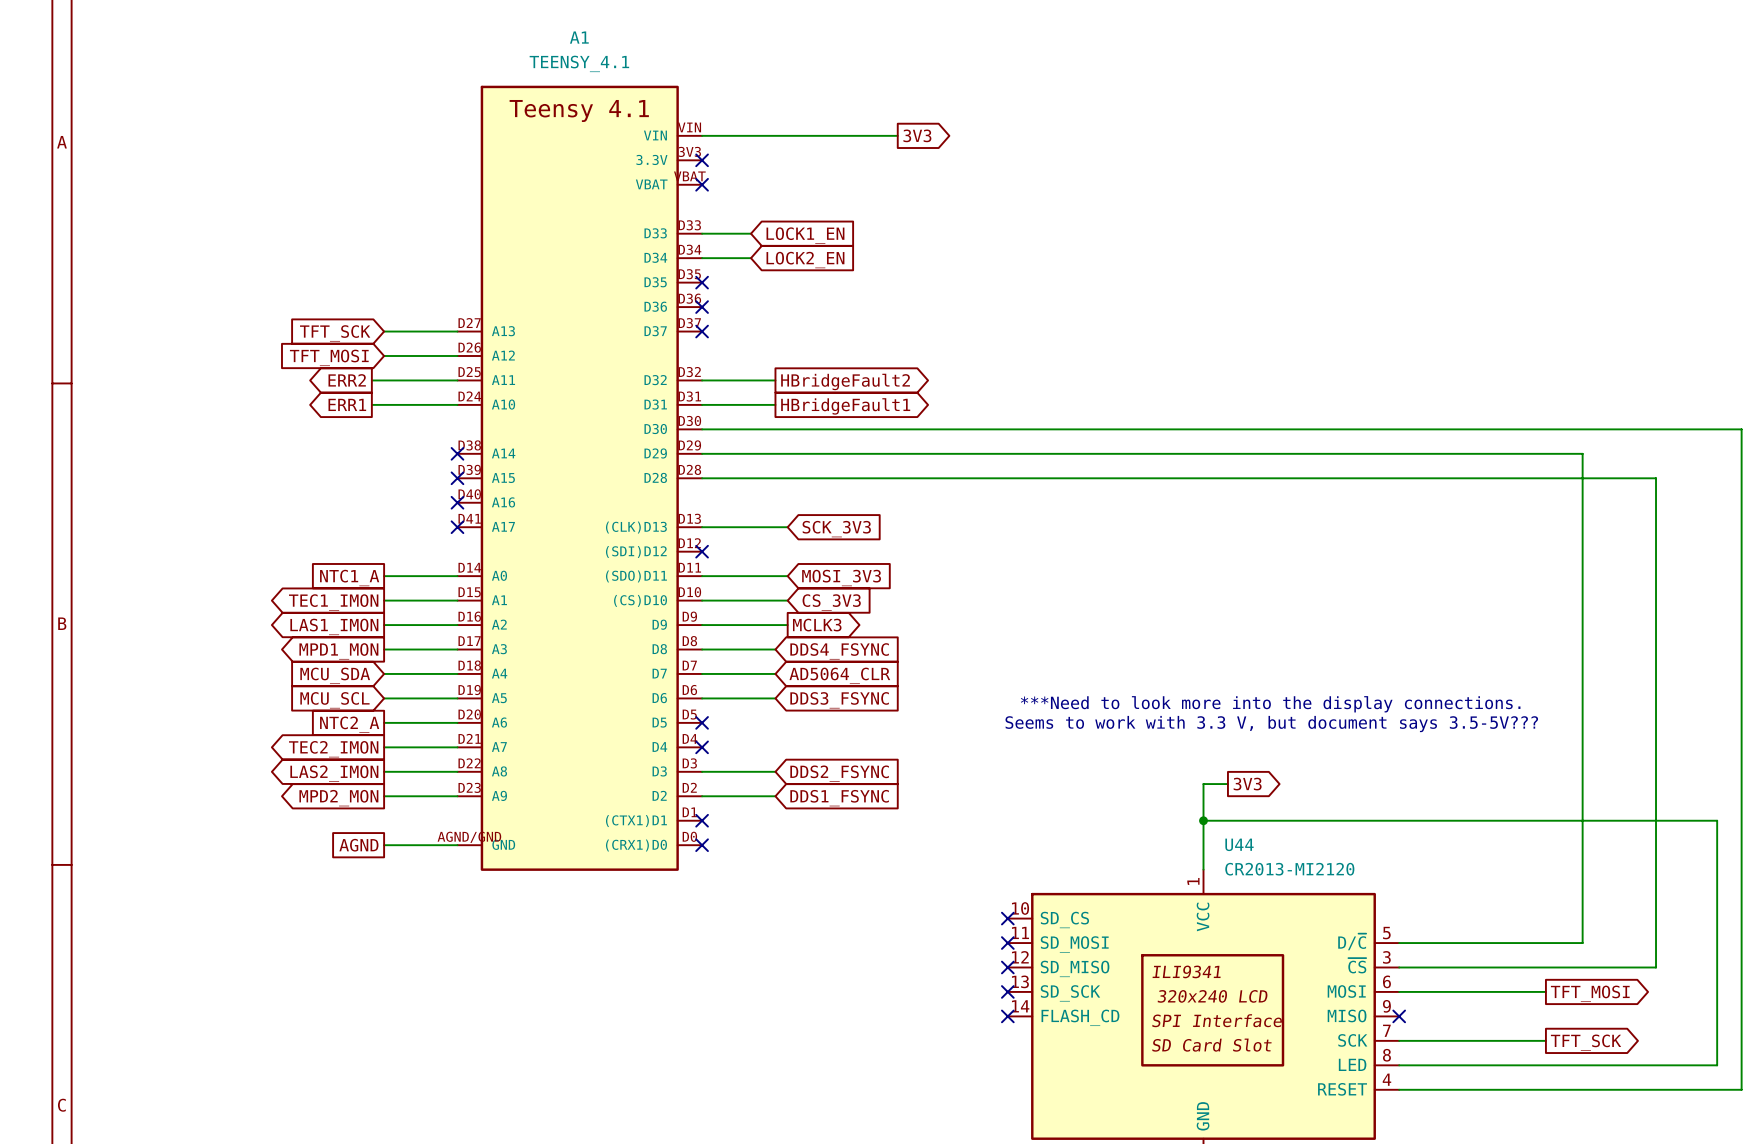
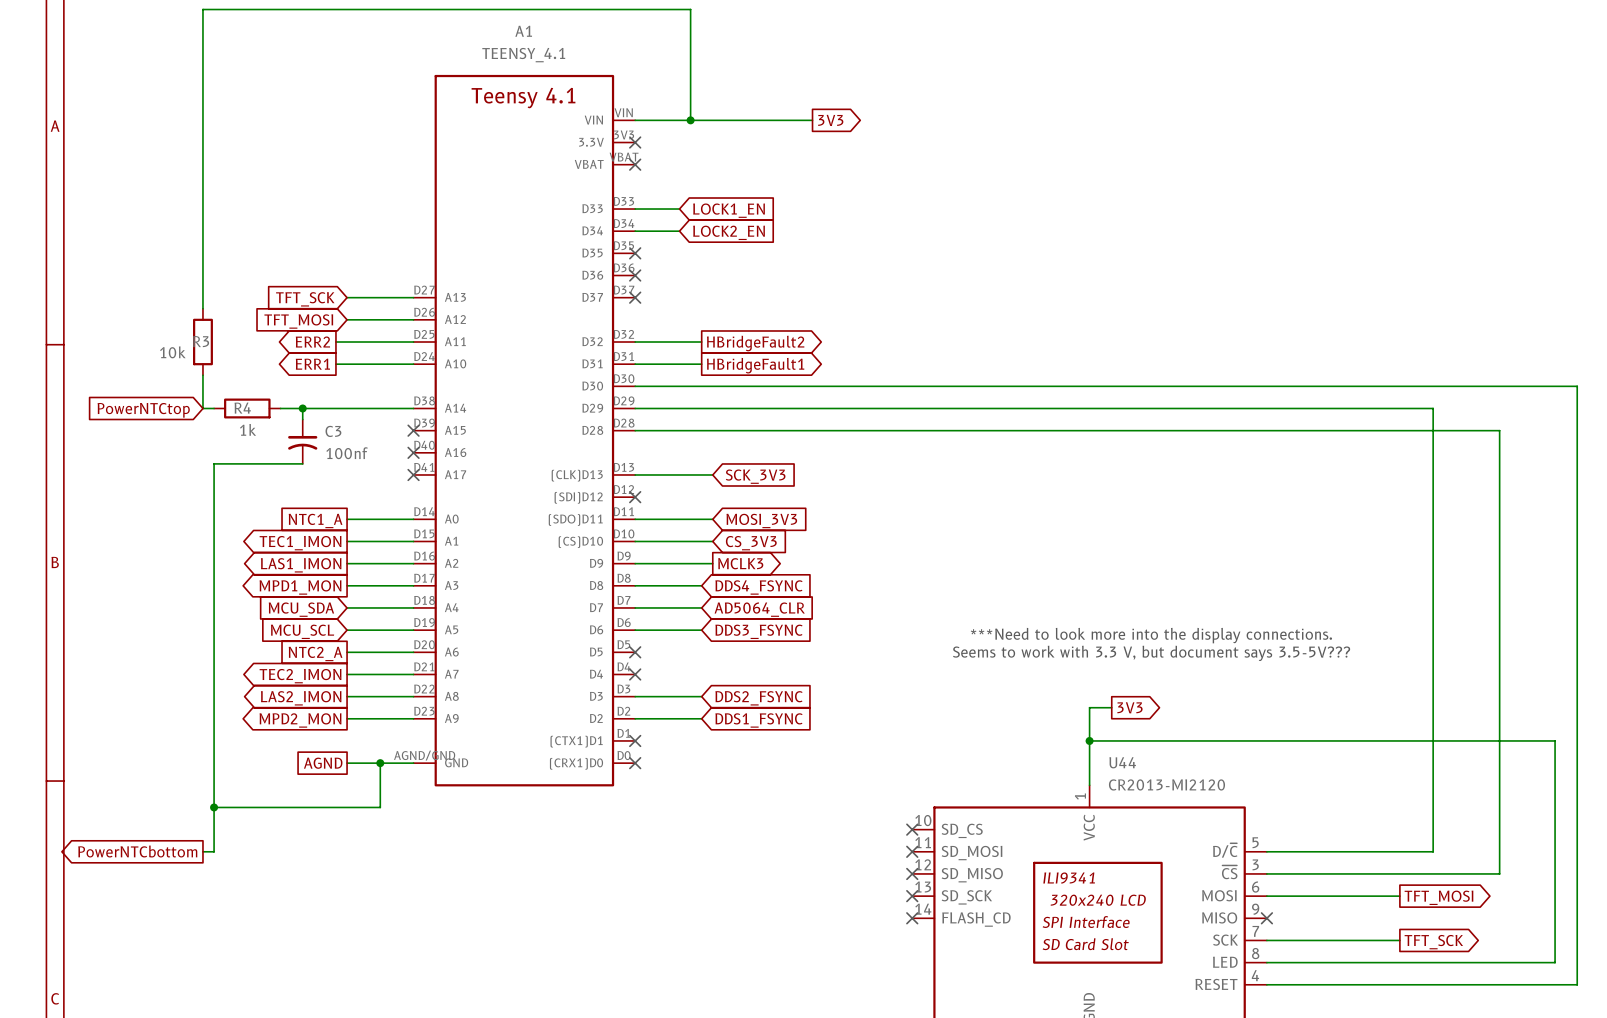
wire: none -> (690, 120) (690, 9) (202, 9) (202, 308)
junction: none -> (690, 120)
R3: none -> 10k (202, 342)
wire: none -> (202, 375) (202, 408) (214, 408)
R4: none -> 1k (247, 408)
wire: none -> (280, 408) (413, 408)
wire: none -> (302, 408) (302, 419)
junction: none -> (302, 408)
no-connect mark: (457, 453) -> none
global label: none -> PowerNTCtop (143, 410)
C3: none -> 100nf (302, 441)
wire: none -> (302, 463) (214, 463) (214, 851) (202, 851)
wire: none -> (380, 763) (380, 807) (214, 807)
junction: none -> (380, 763)
junction: none -> (214, 807)
global label: none -> PowerNTCbottom (137, 851)

